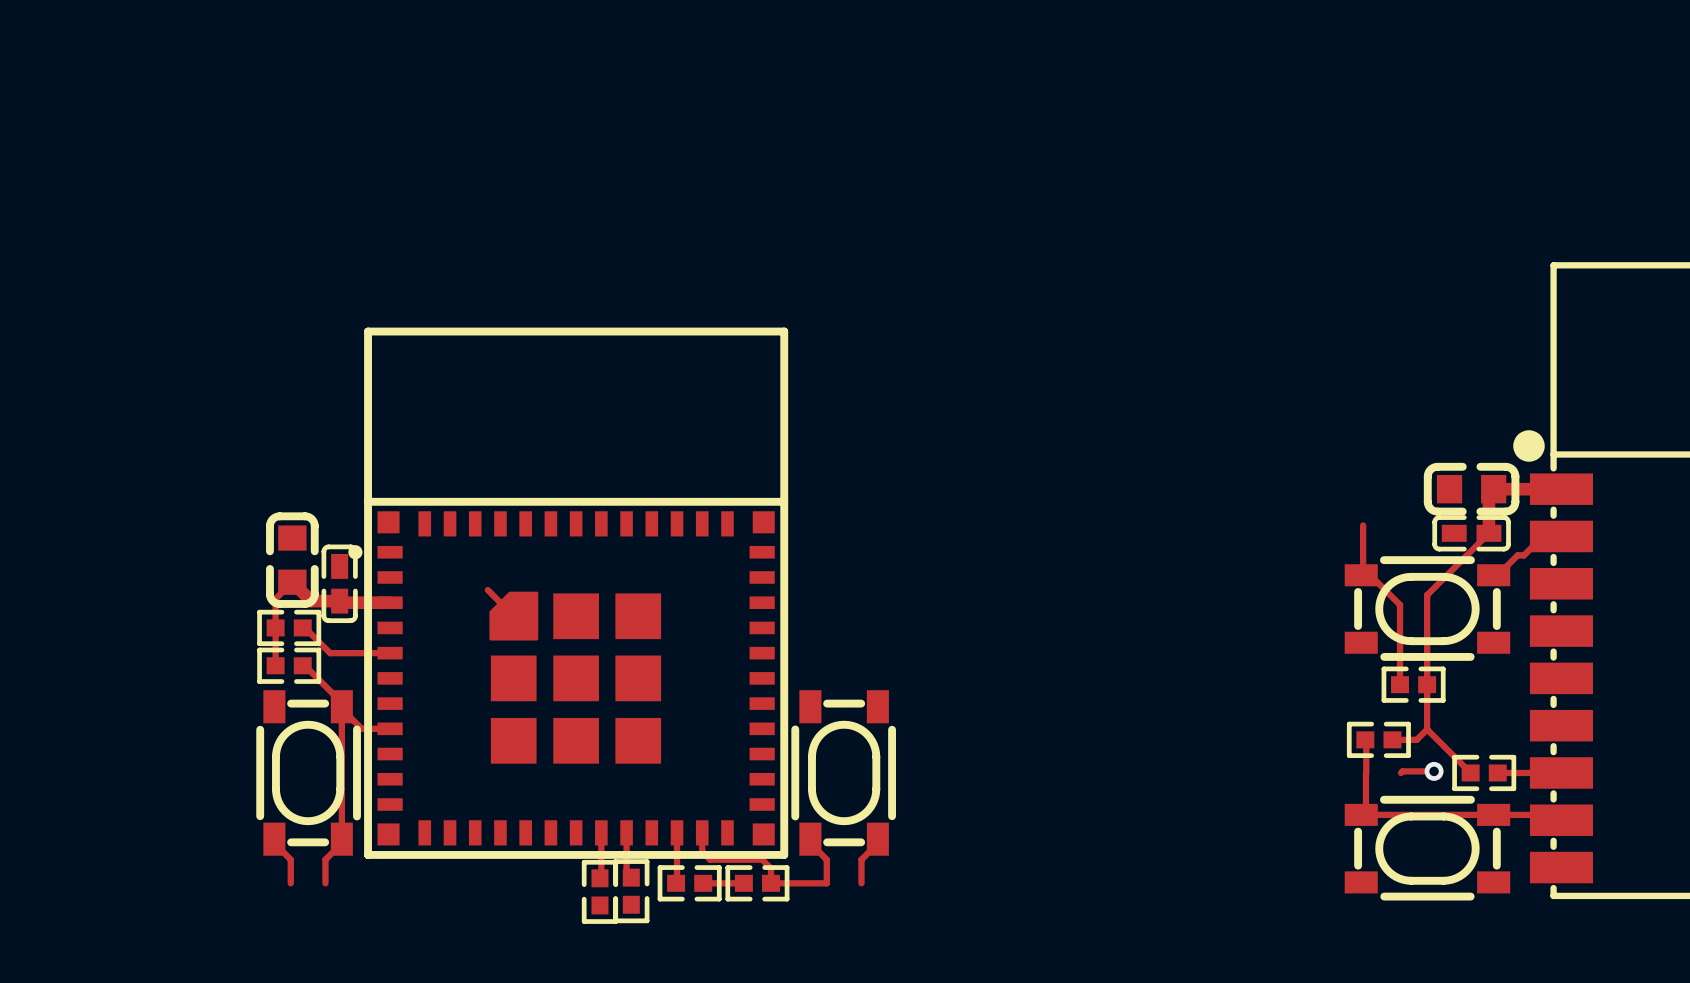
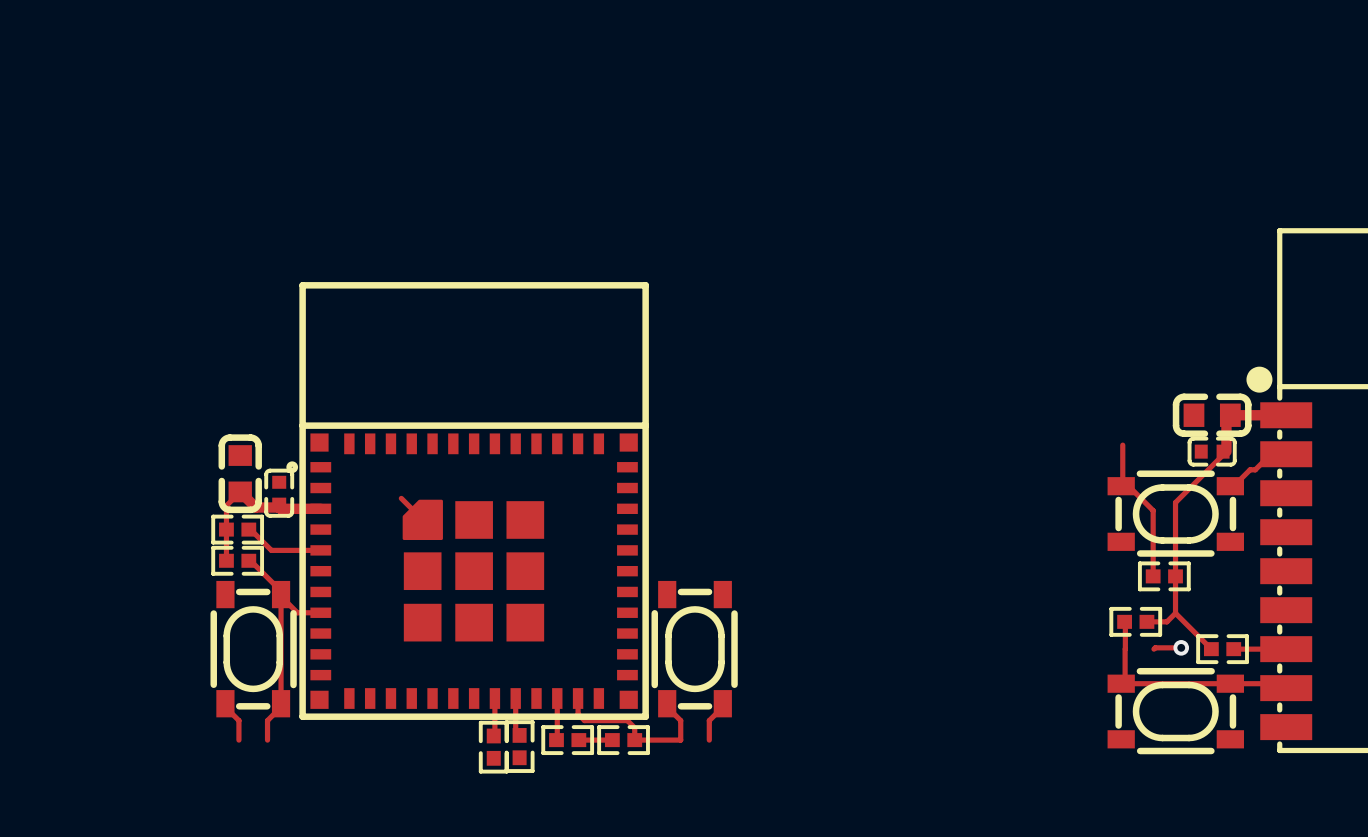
part footprint: [1432, 515, 1511, 552] -> [1187, 436, 1237, 467]
part footprint: [321, 544, 358, 624] -> [264, 468, 295, 518]

